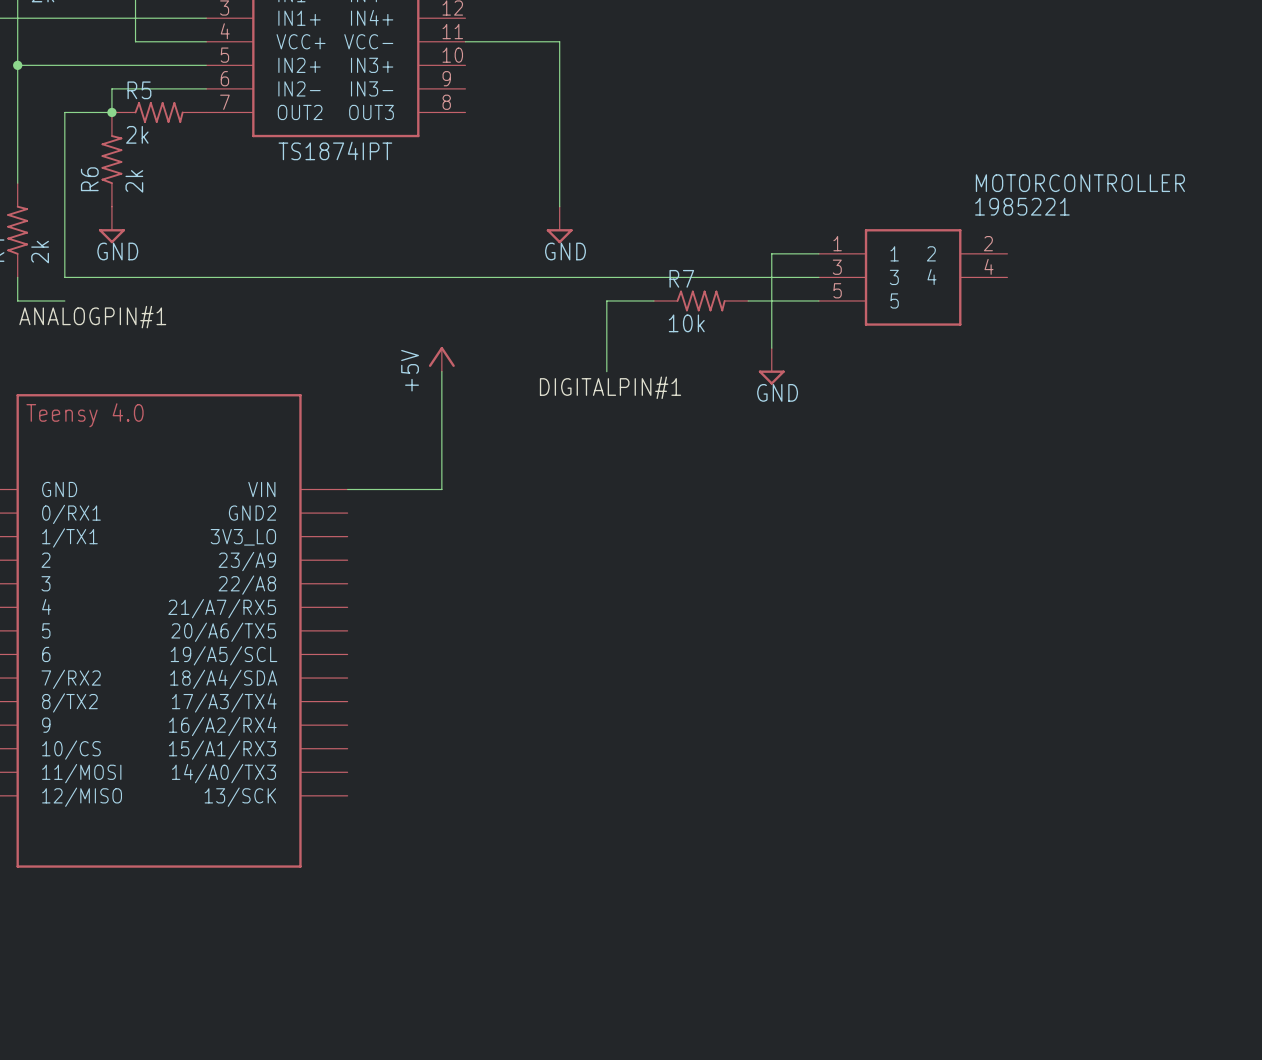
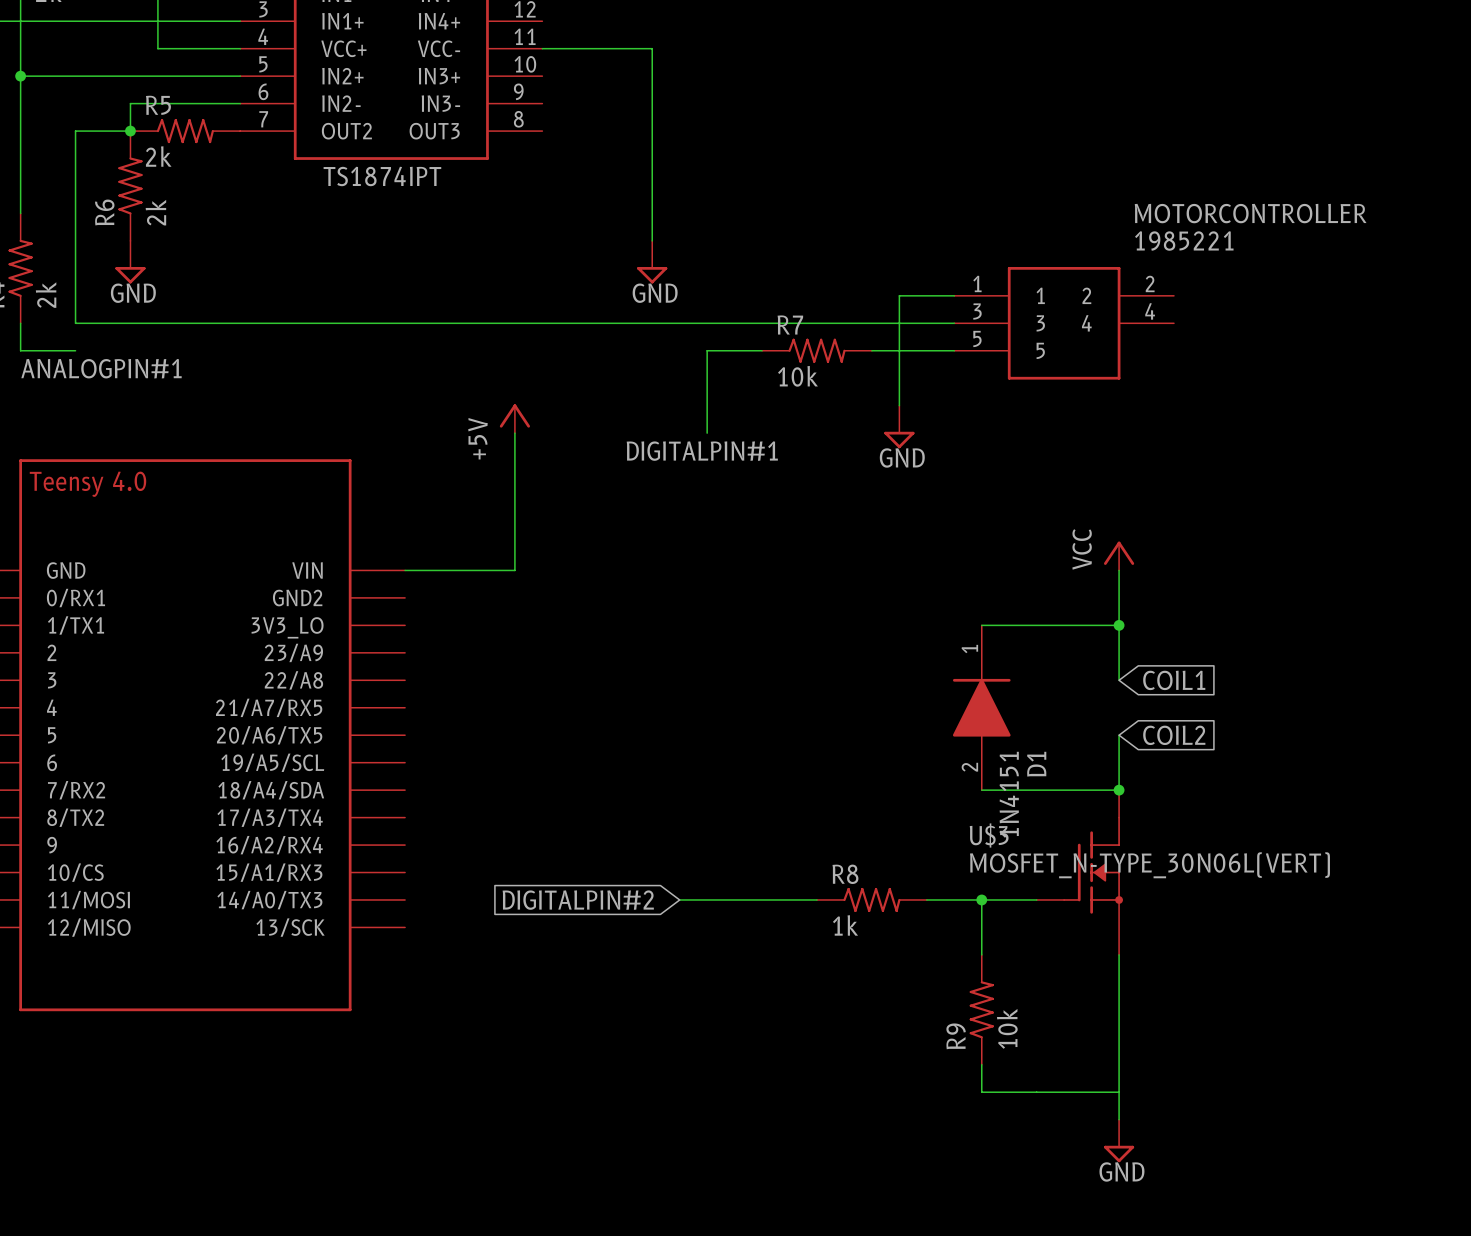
power symbol: none -> VCC (1119, 556)
wire: none -> (1119, 570) (1119, 680)
wire: none -> (981, 625) (1119, 625)
junction: none -> (1119, 625)
global label: none -> COIL1 (1174, 680)
D1: none -> 1N4151 (981, 707)
wire: none -> (1119, 735) (1119, 790) (981, 790)
global label: none -> COIL2 (1174, 735)
junction: none -> (1119, 790)
U$3: none -> MOSFET_N-TYPE_30N06L(VERT) (1079, 872)
wire: none -> (679, 899) (817, 899)
R8: none -> 1k (871, 899)
wire: none -> (926, 899) (1036, 899)
wire: none -> (981, 899) (981, 954)
junction: none -> (981, 899)
global label: none -> DIGITALPIN#2 (578, 900)
wire: none -> (1119, 954) (1119, 1119)
R9: none -> 10k (981, 1009)
wire: none -> (981, 1064) (981, 1092) (1119, 1092)
power symbol: none -> GND (1119, 1140)

